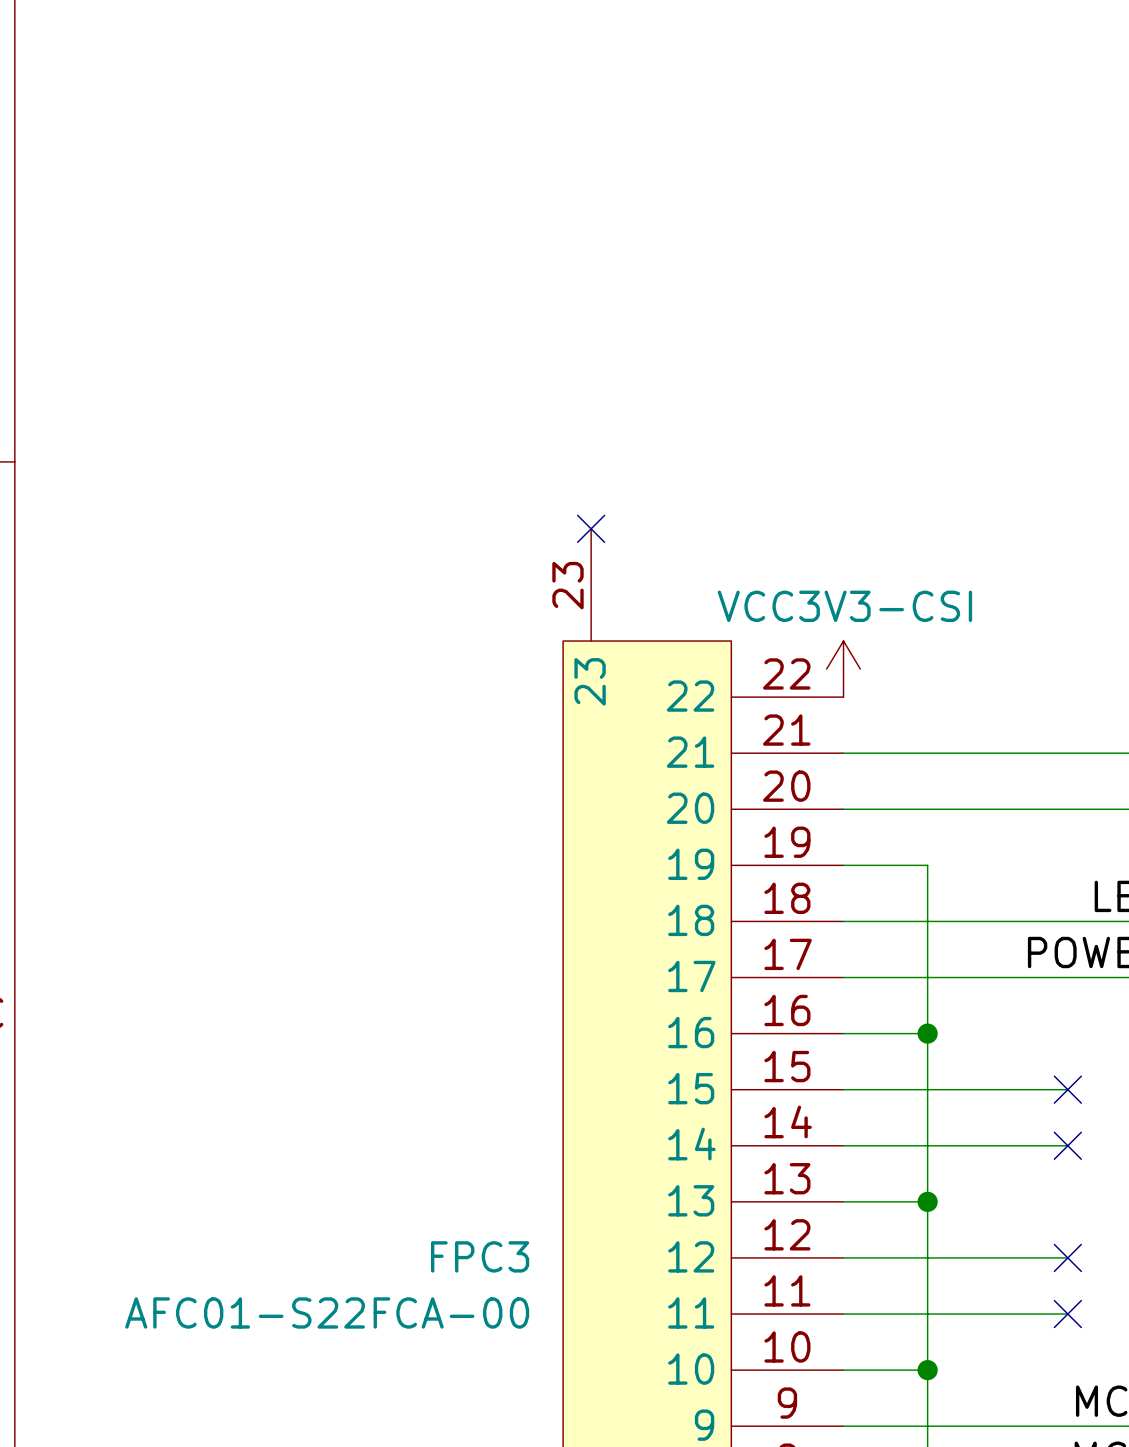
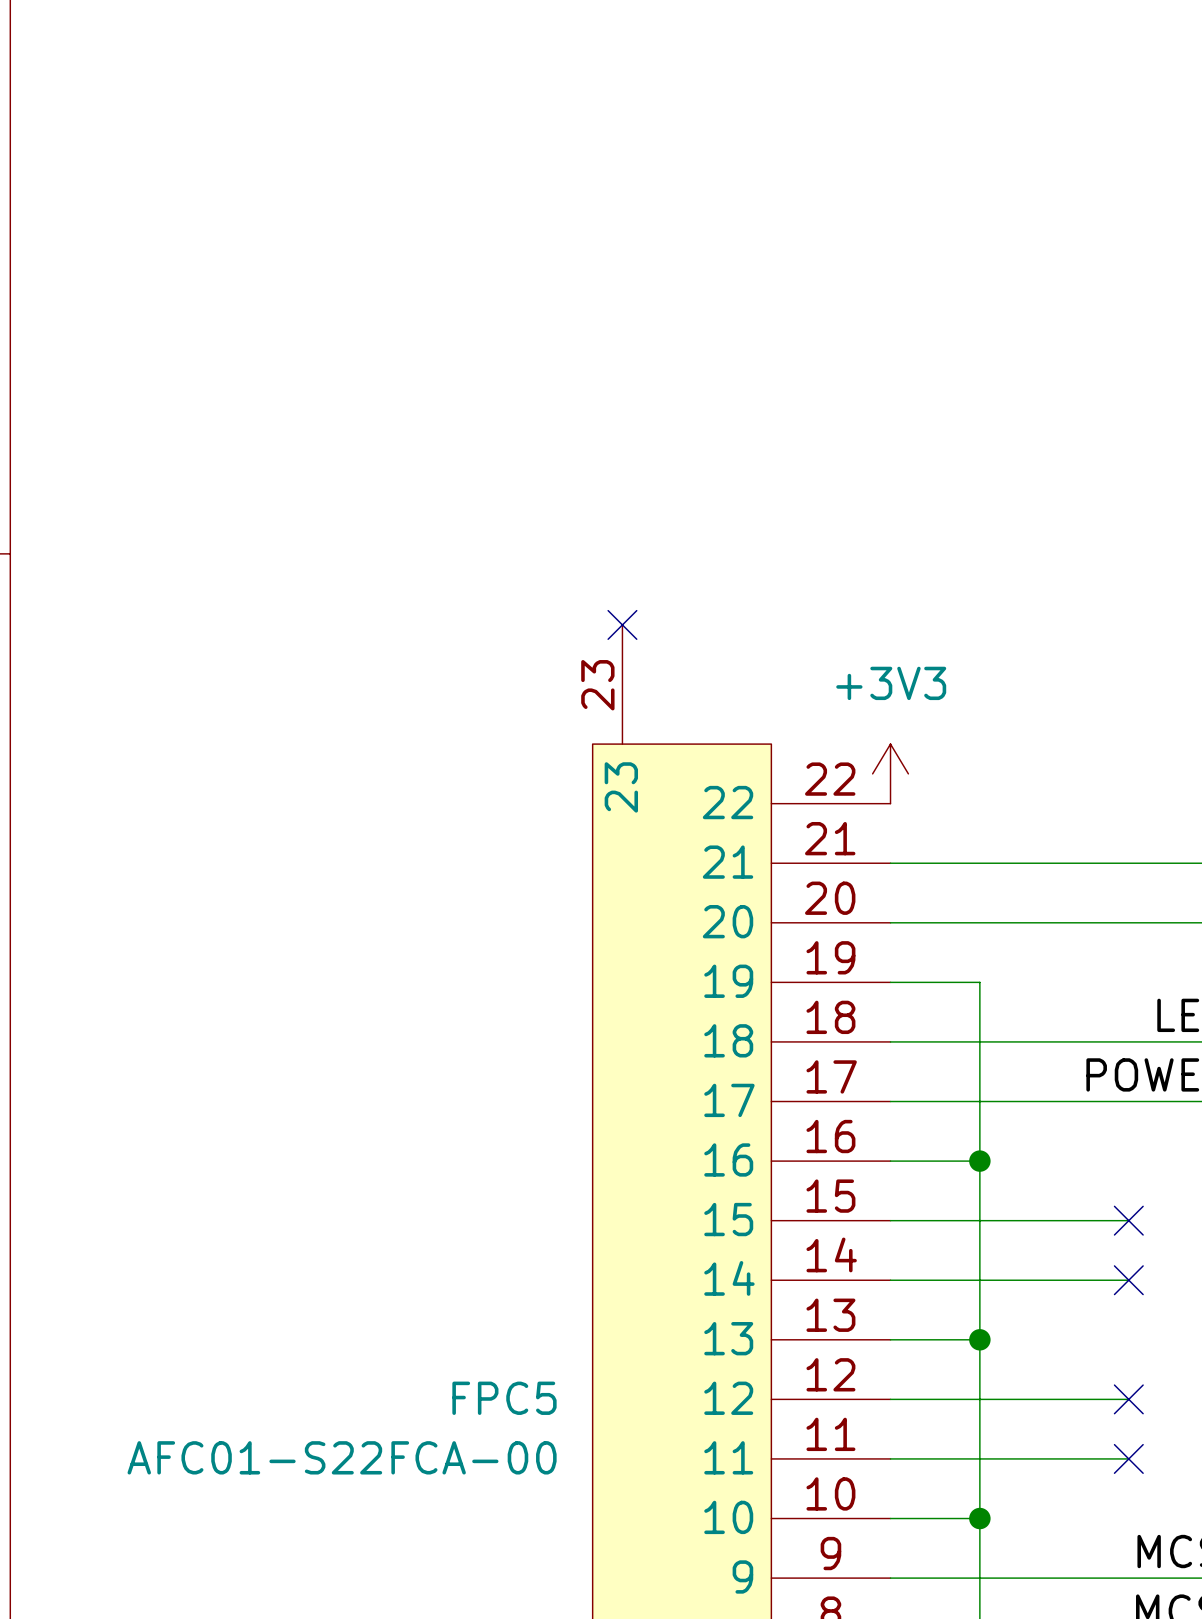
power symbol: VCC3V3-CSI (843, 669) -> +3V3 (890, 773)
FPC3 name: FPC3 (480, 1256) -> FPC5 (504, 1398)

